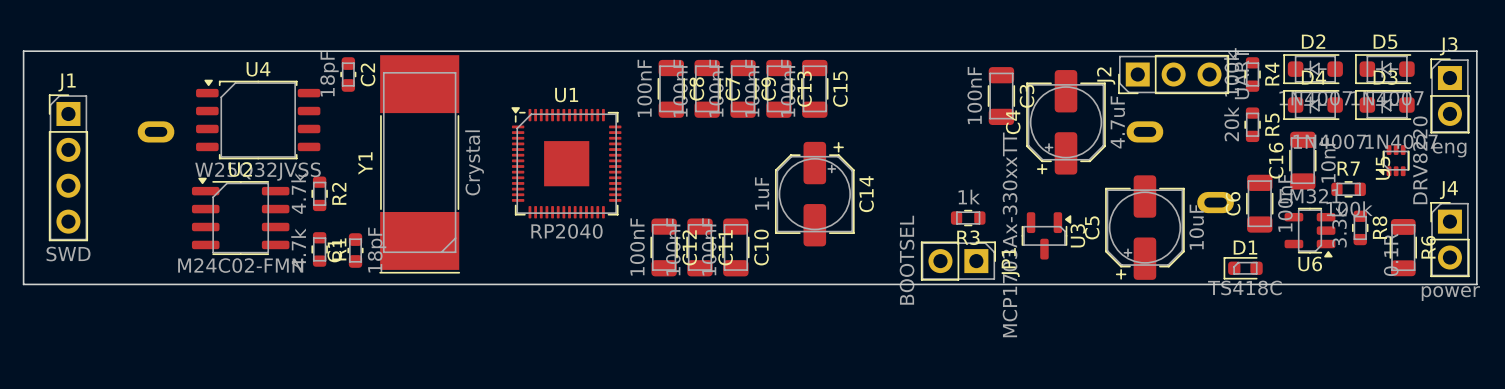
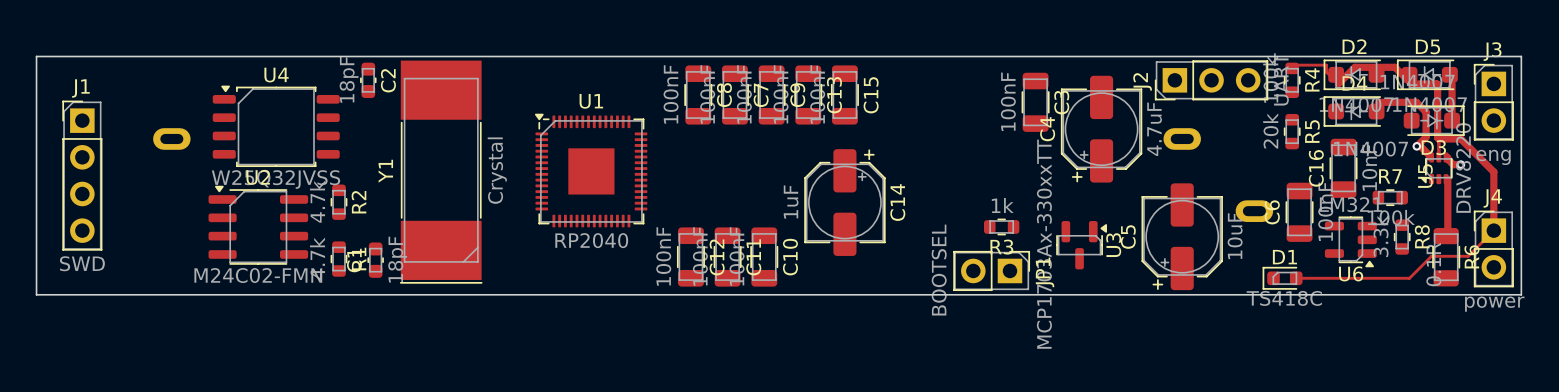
track: none -> (1292, 68) (1295, 65) (1326, 65) (1326, 72) (1338, 83) (1354, 67) (1394, 67) (1411, 83) (1436, 83) (1438, 138)
track: none -> (1452, 83) (1452, 120)
track: none -> (1378, 102) (1416, 102) (1426, 112) (1426, 137) (1416, 146) (1420, 146) (1429, 157)
D3 rotation: 0° (1384, 105) -> 180° (1434, 120)
track: none -> (1438, 138) (1460, 138) (1493, 171) (1493, 230) (1468, 256) (1431, 256) (1409, 278) (1296, 278)
track: none -> (1438, 138) (1438, 157)
via: none -> (1416, 146)
track: none -> (1447, 157) (1453, 164) (1460, 164)
via: none -> (1460, 164)
track: none -> (1447, 179) (1447, 234) (1446, 236)

